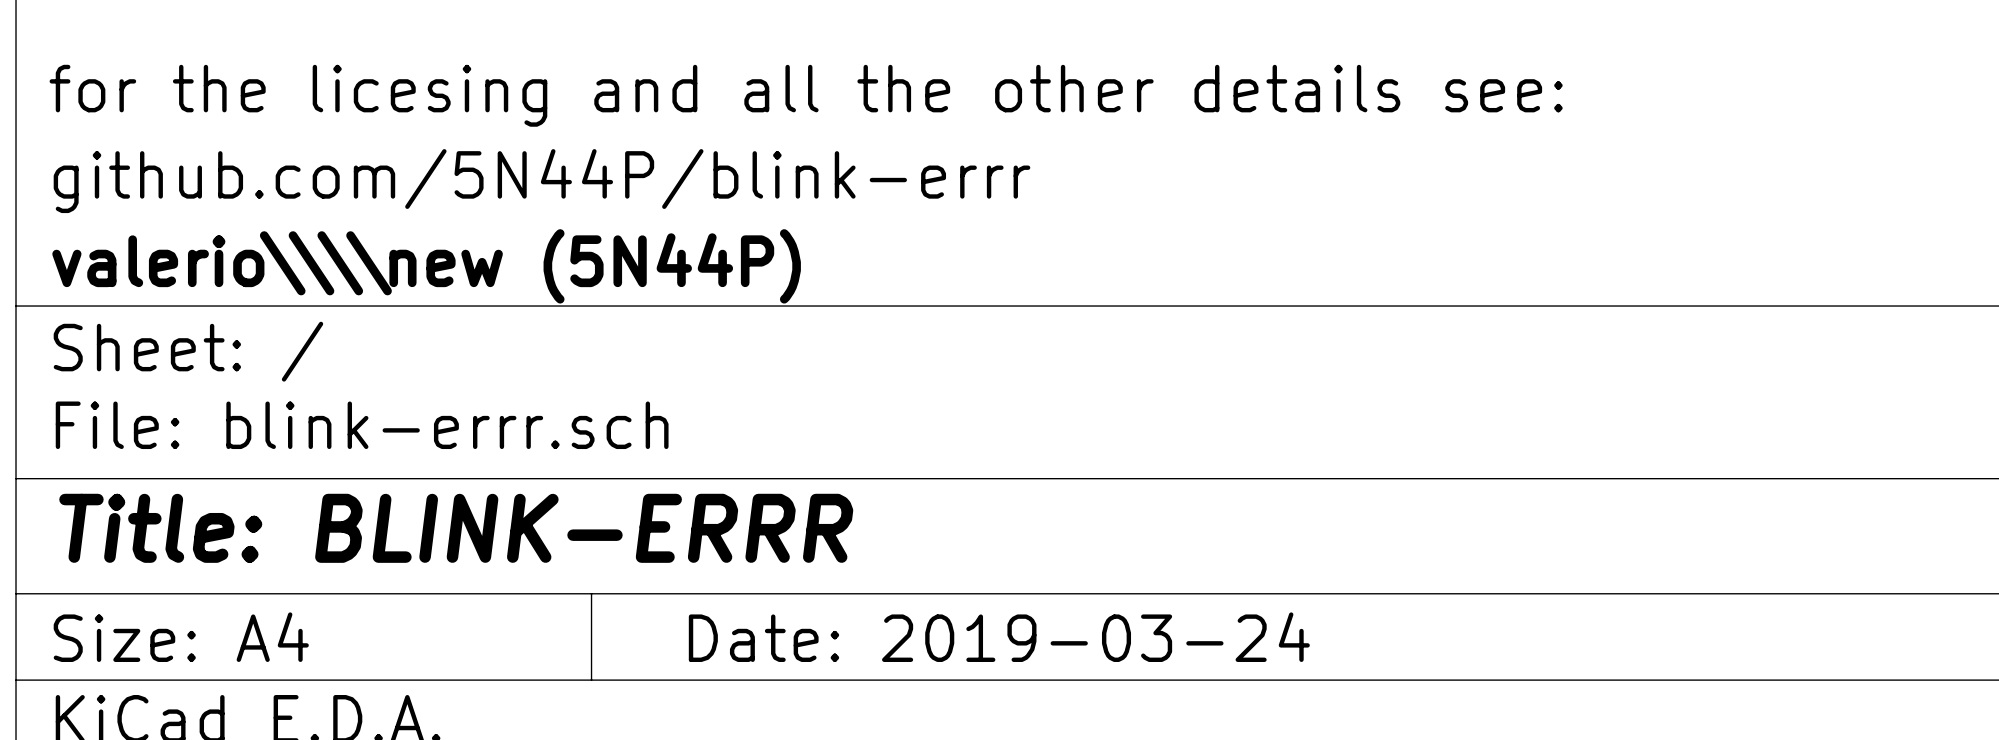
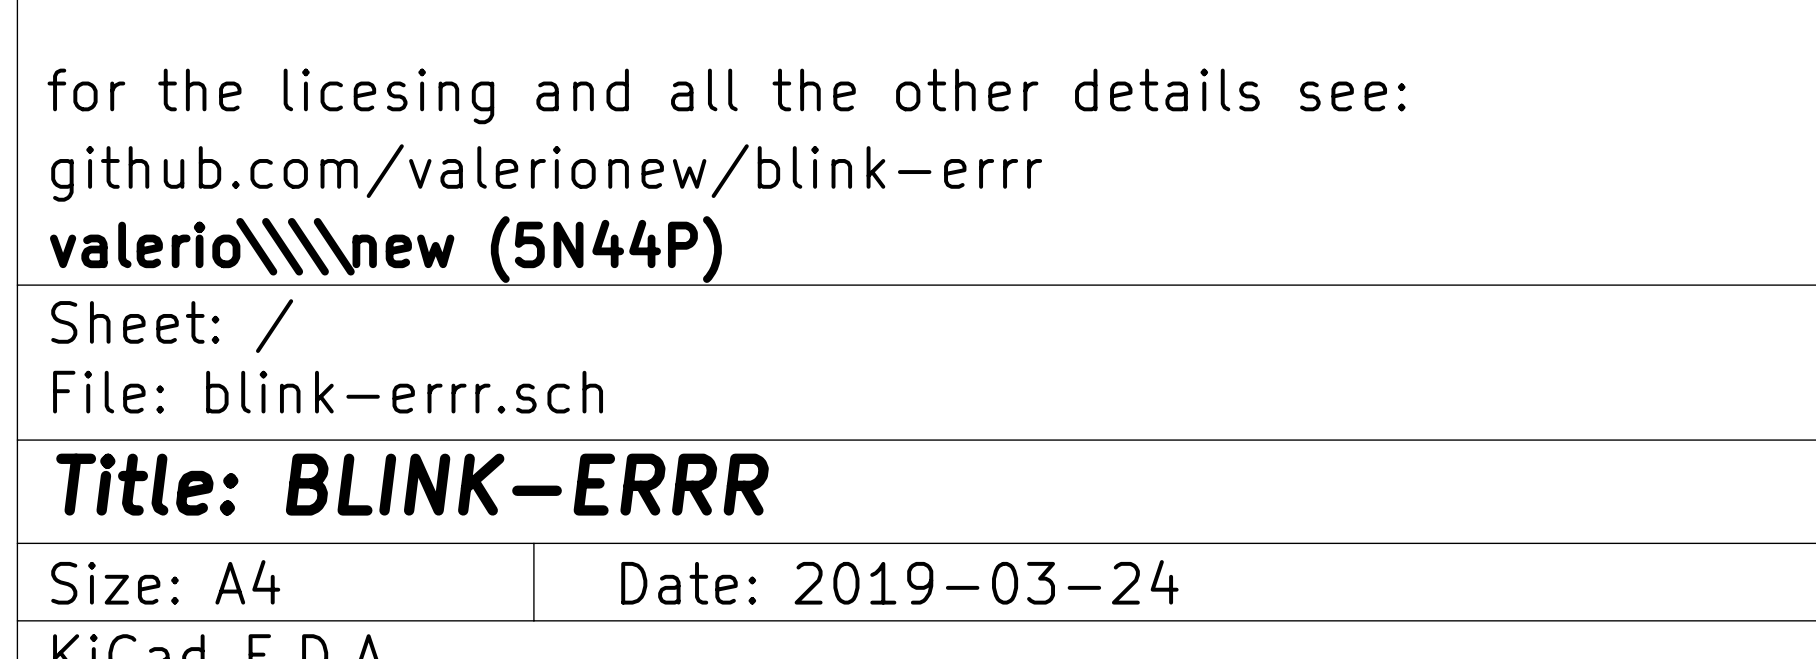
title block: github.com/5N44P/blink-errr (542, 181) -> github.com/valerionew/blink-errr (546, 172)

